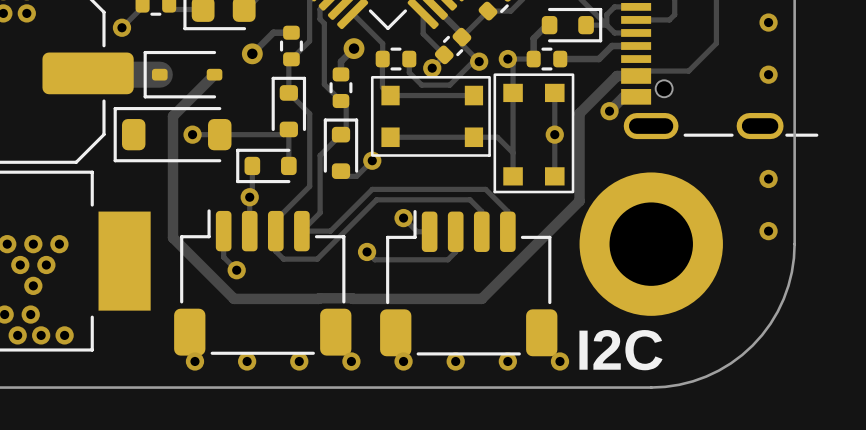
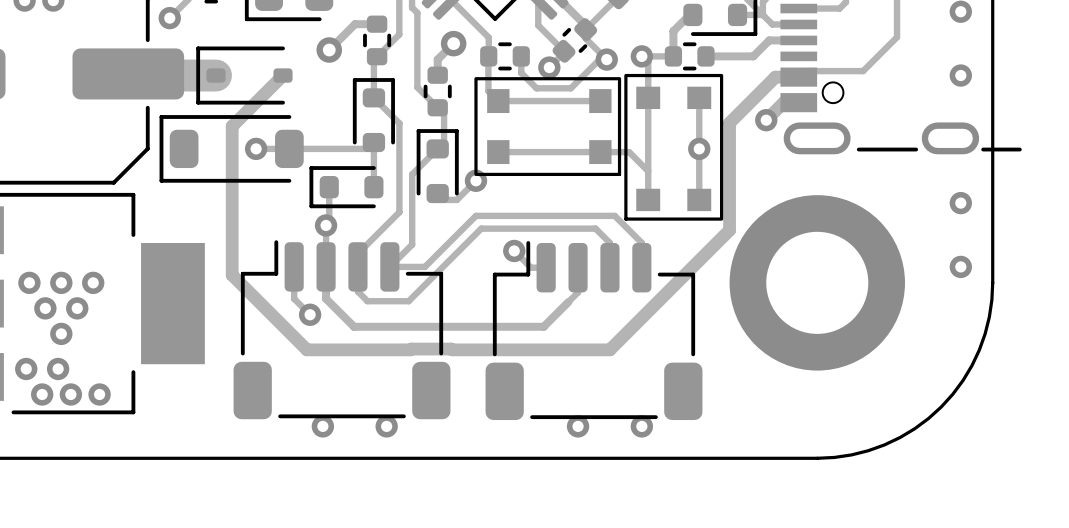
track: (367, 251) (374, 259) (447, 259) -> (326, 266) (326, 298) (354, 326) (543, 326) (568, 302)
via: (367, 251) -> none
text: I2C (620, 350) -> none
via: (194, 361) -> none
via: (351, 361) -> none
via: (403, 361) -> none
via: (559, 361) -> none

